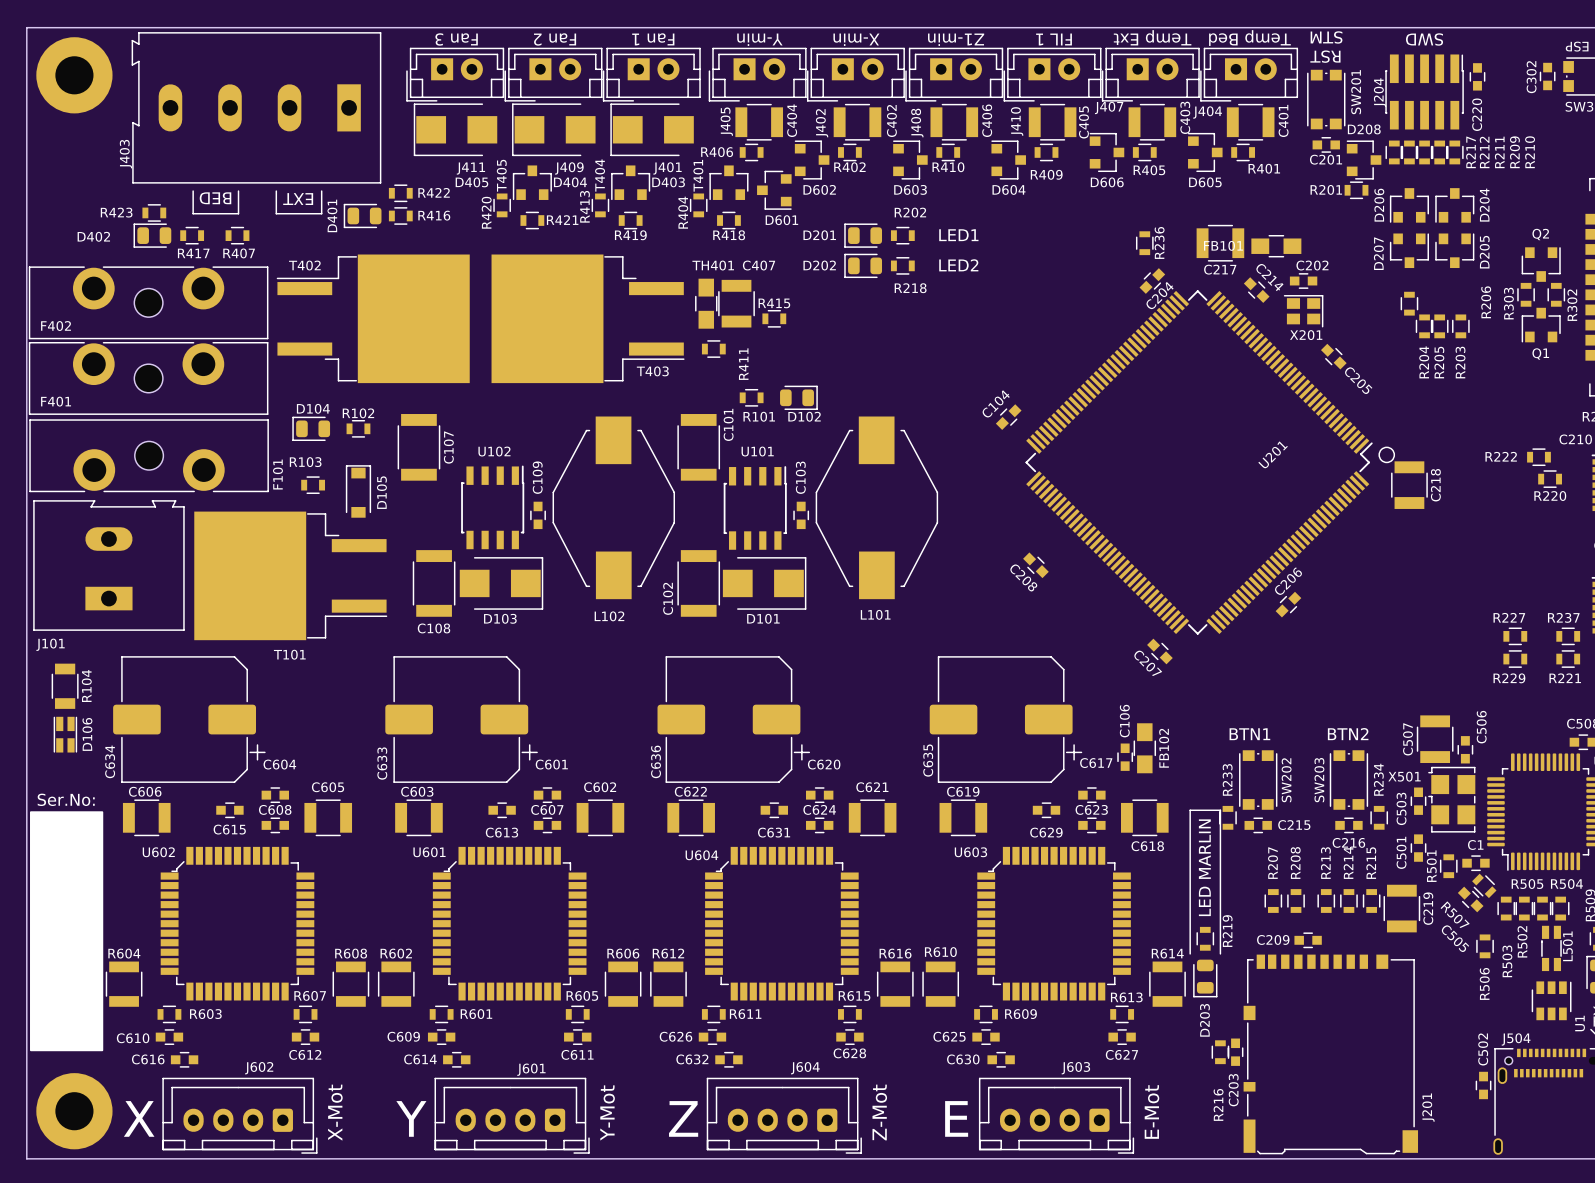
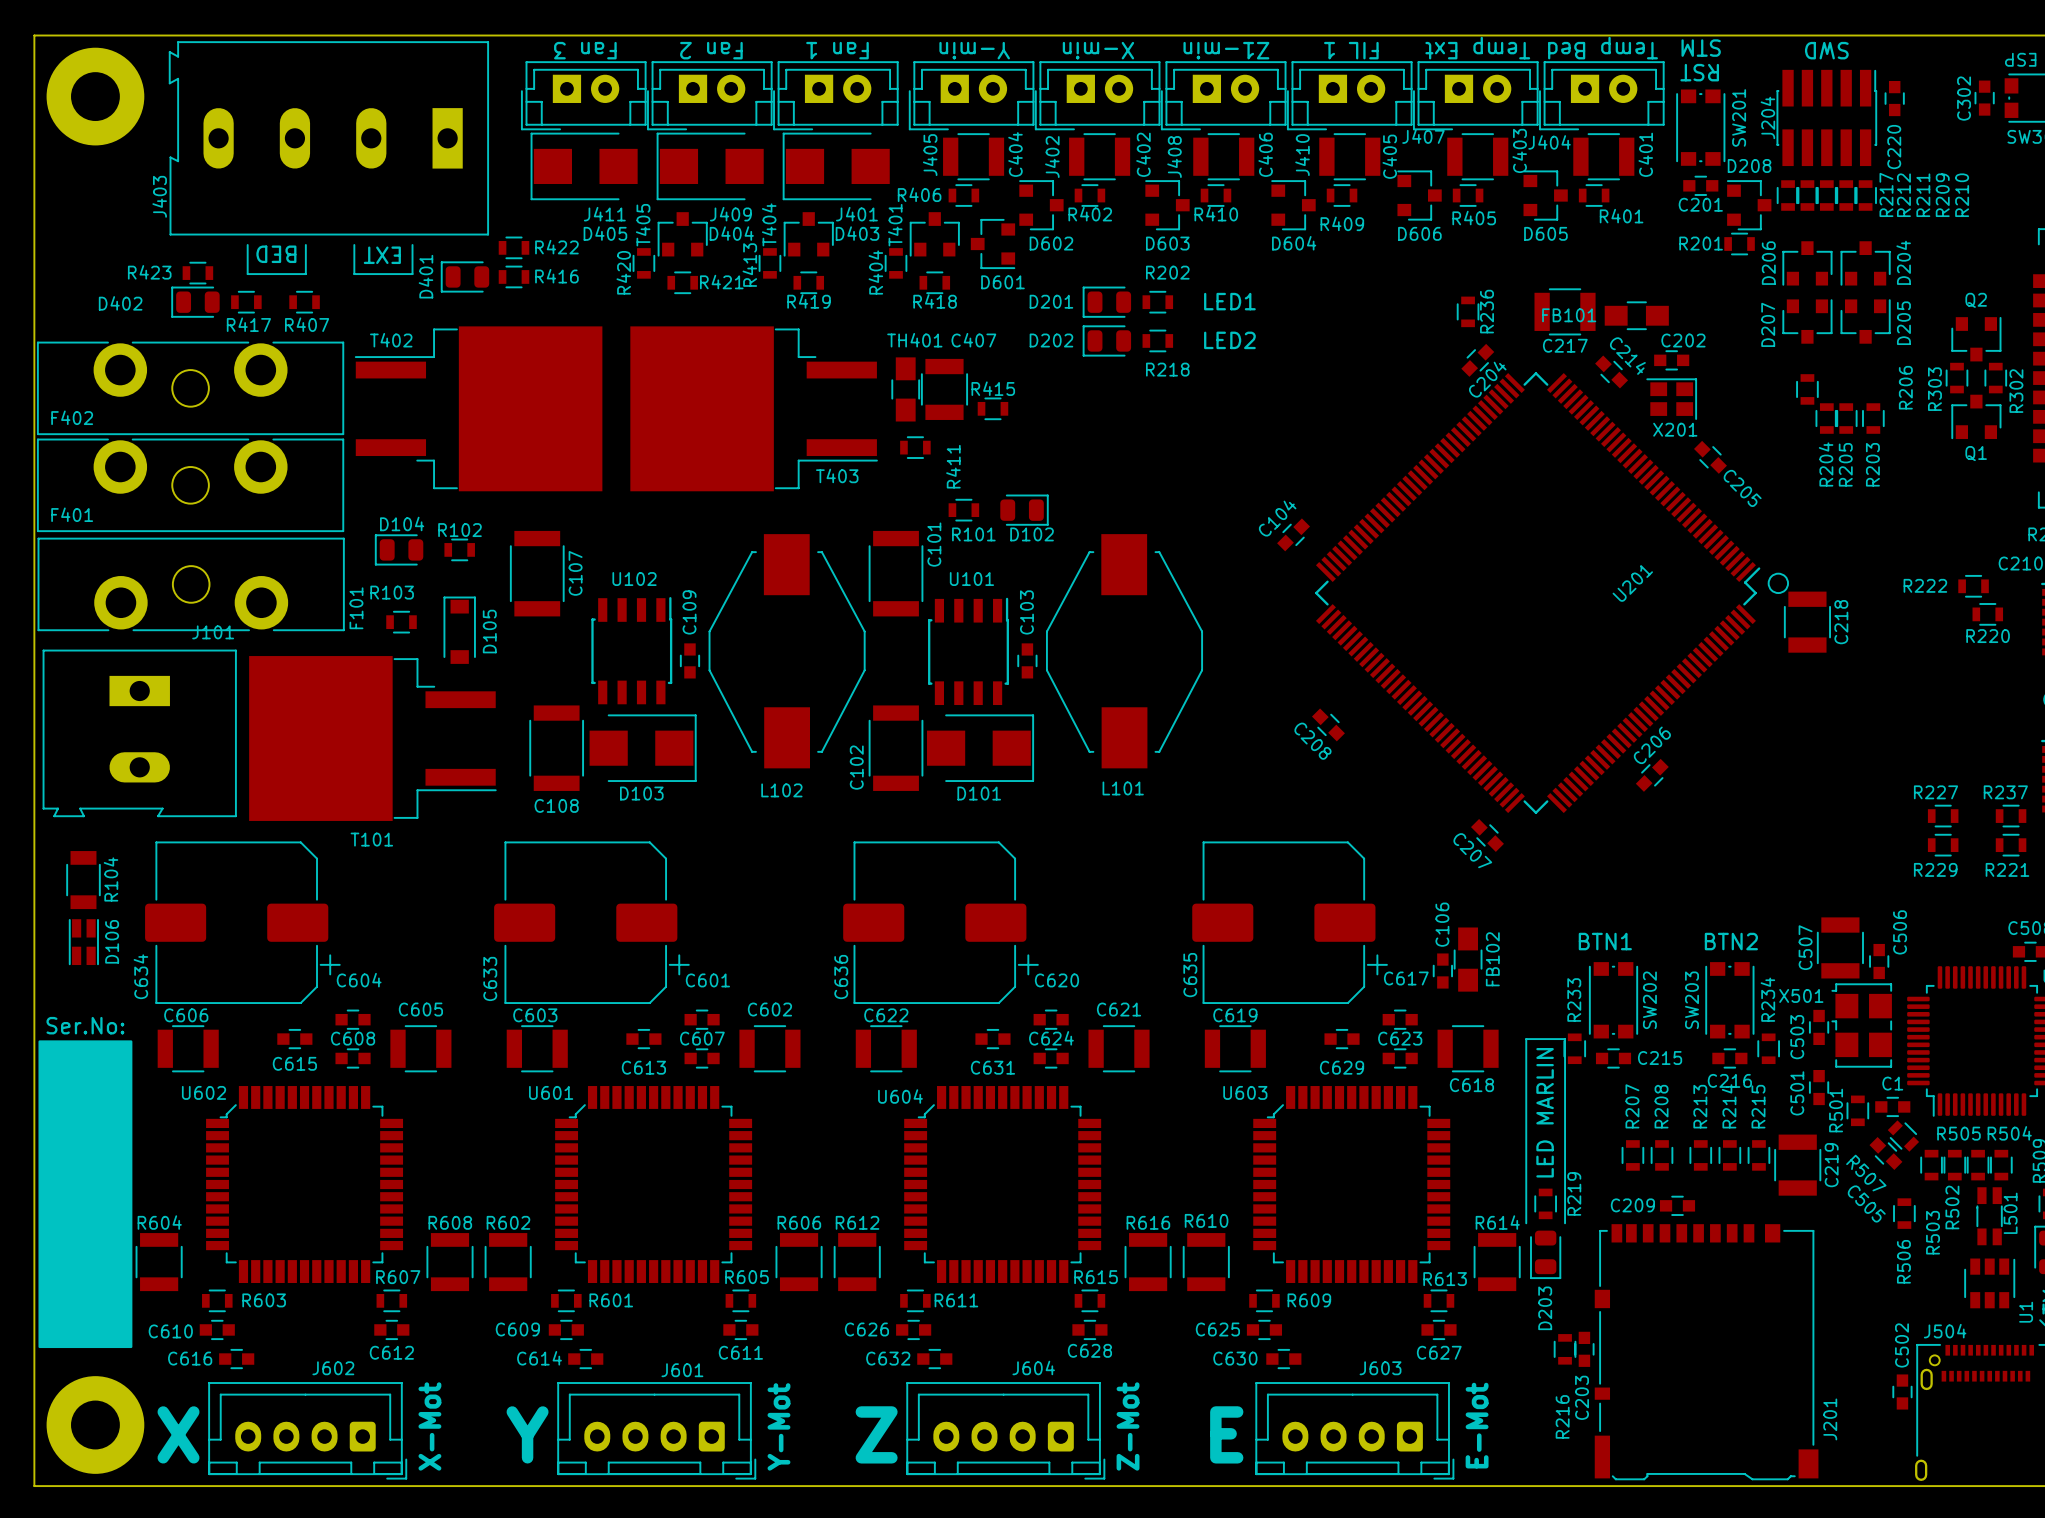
J101 rotation: 0° (108, 565) -> 180° (139, 733)

